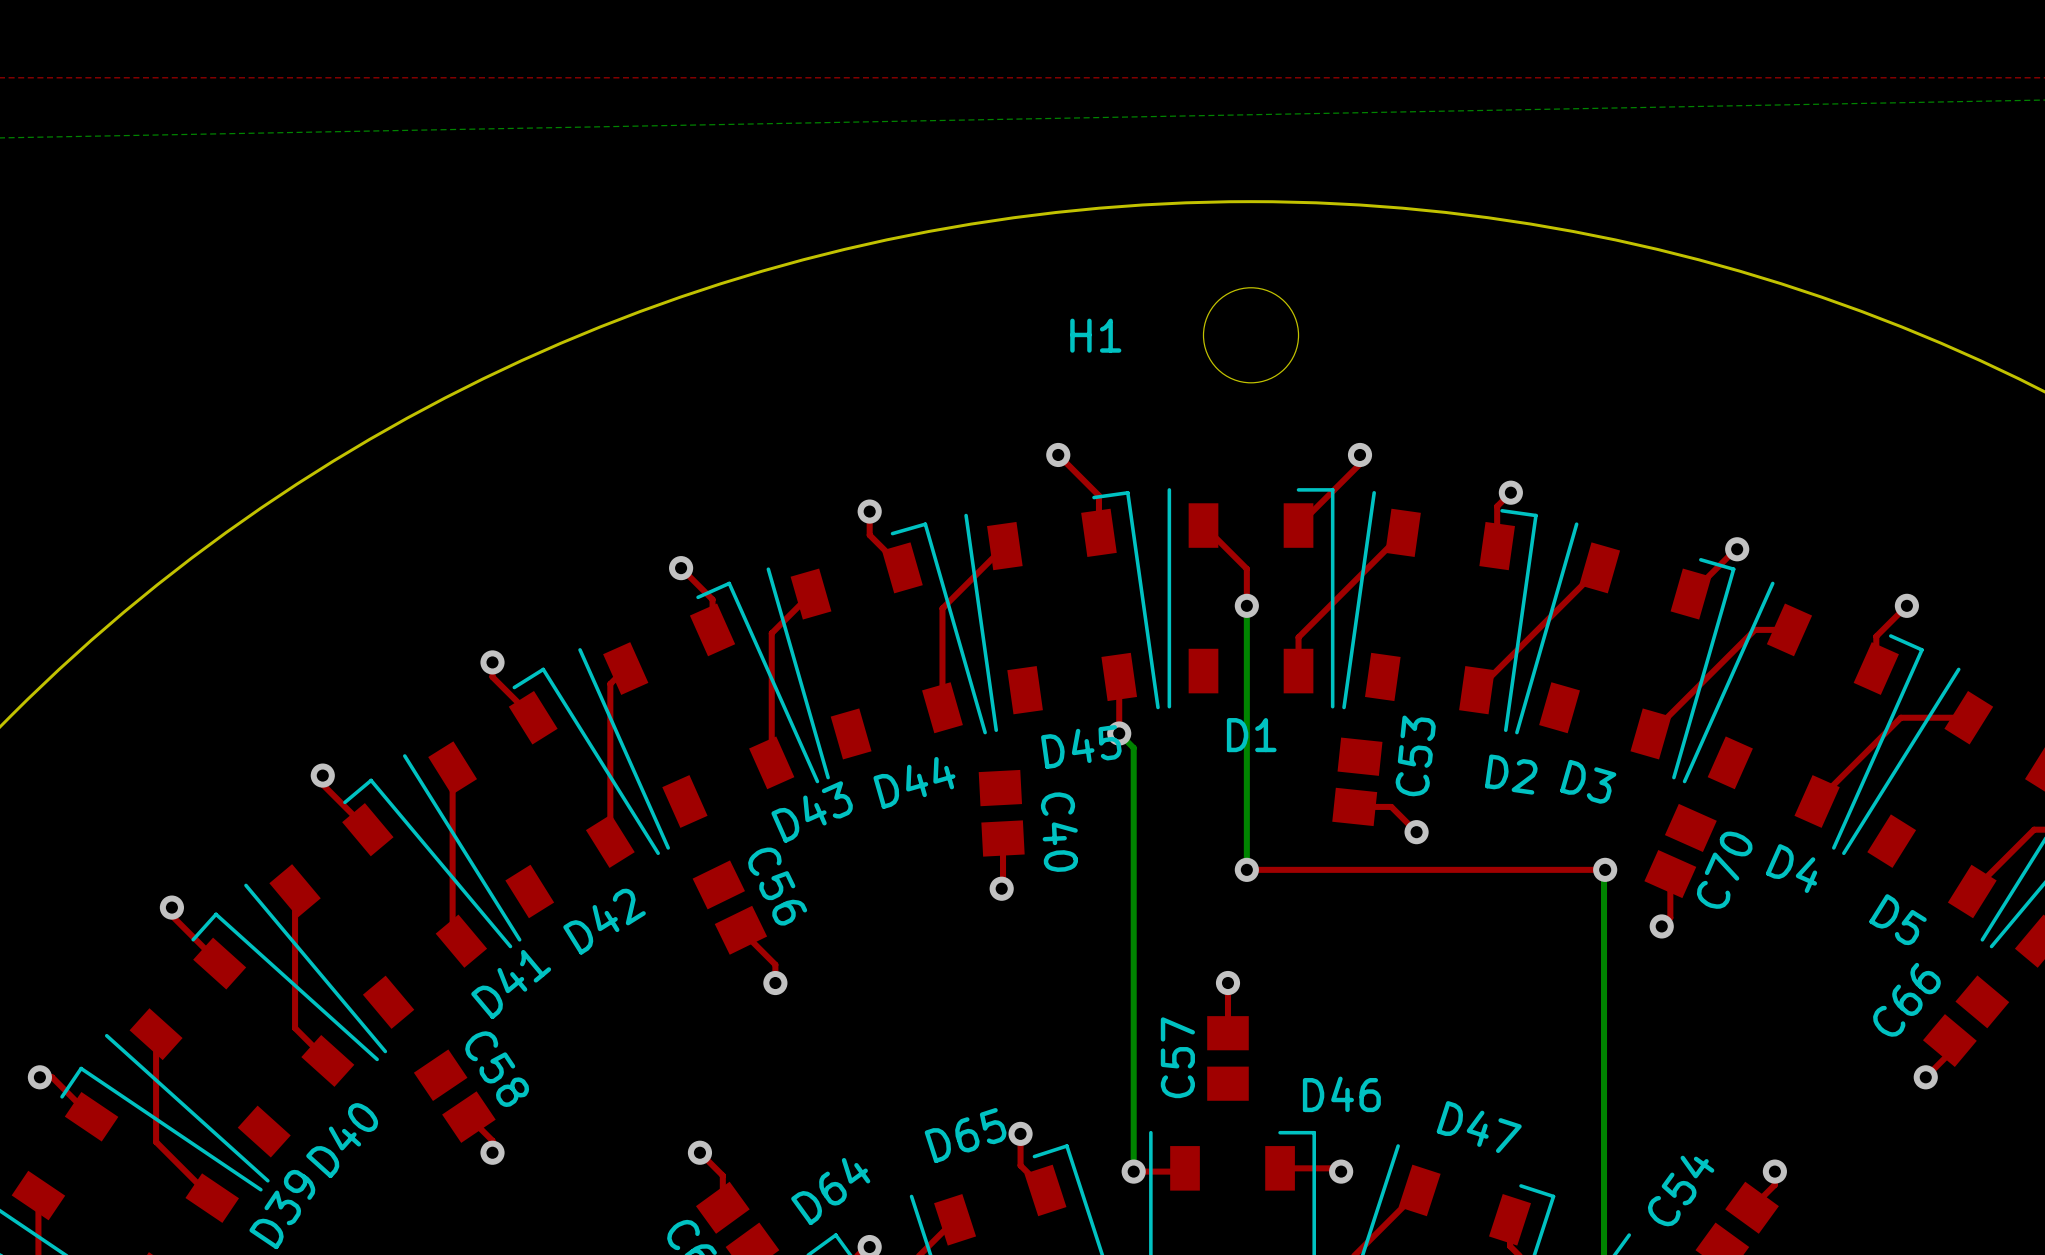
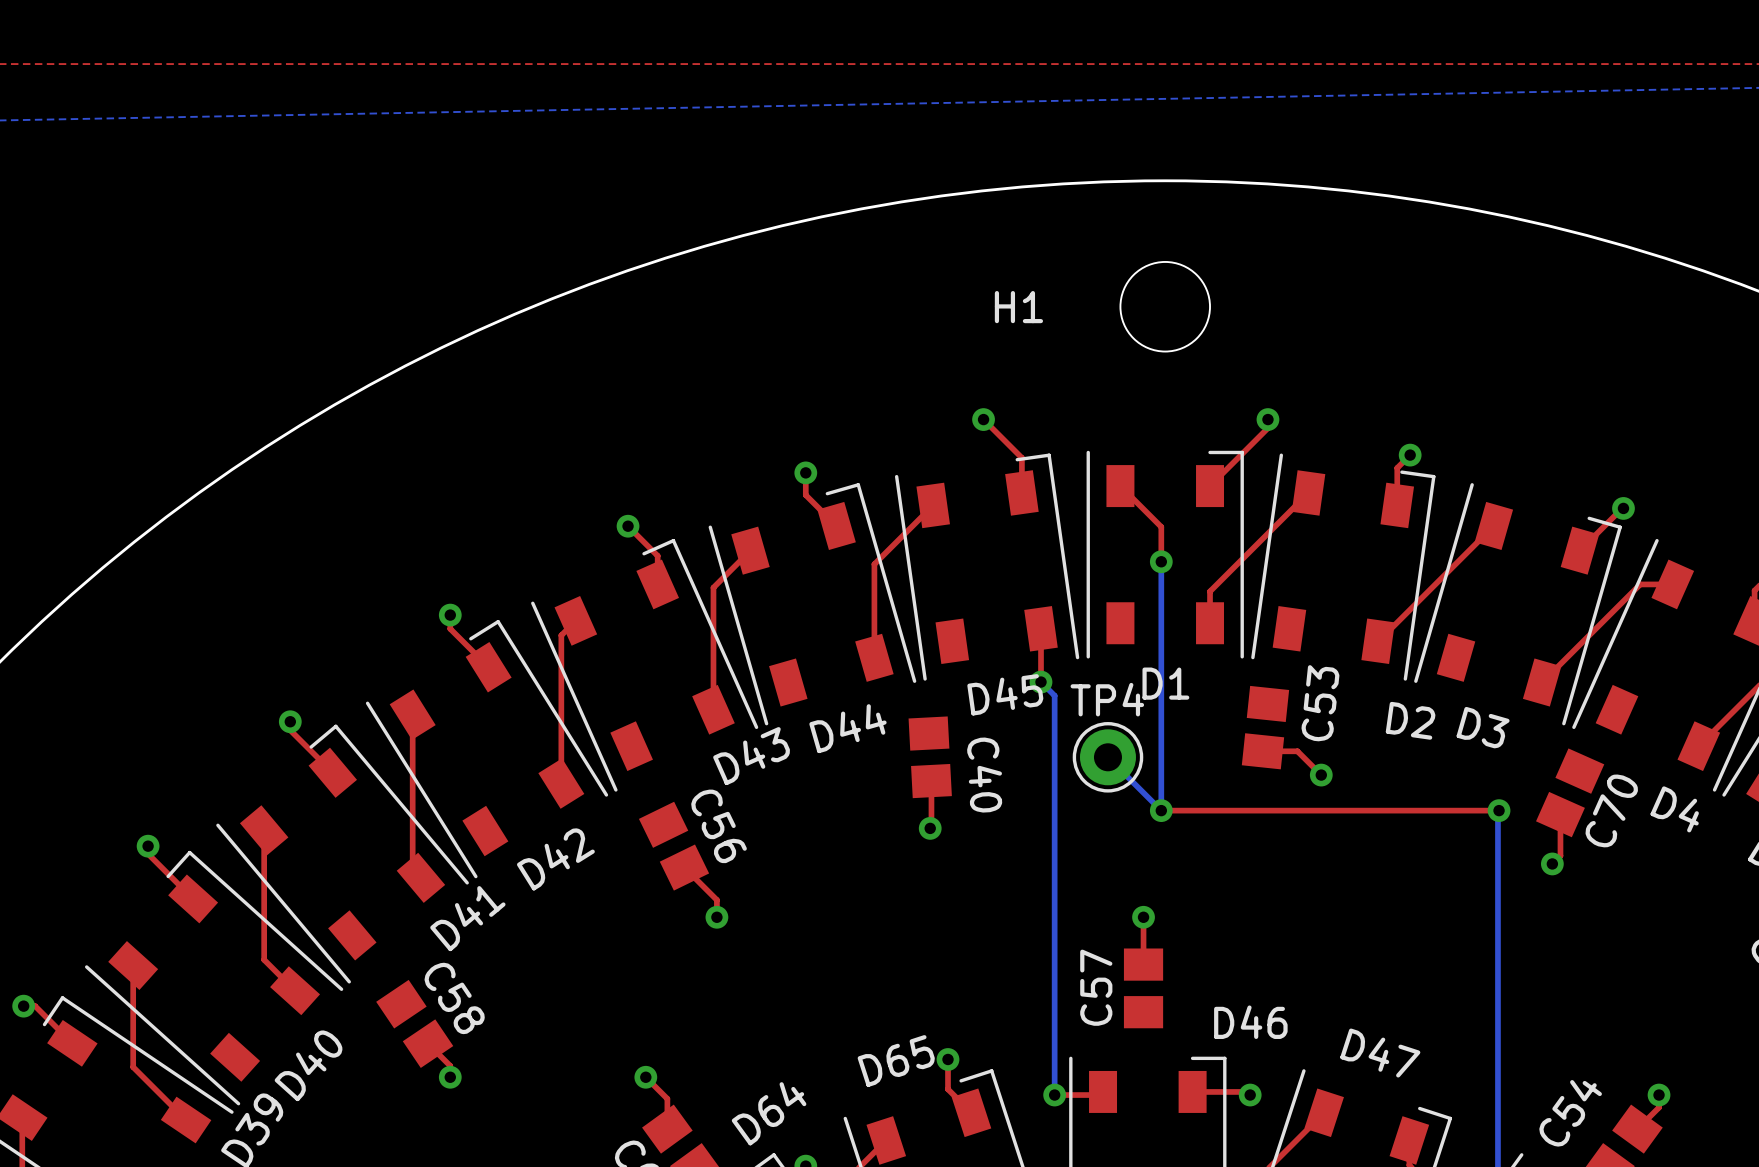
bottom track: none -> (1107, 757) (1161, 810)
TP4: none -> (1107, 757)

